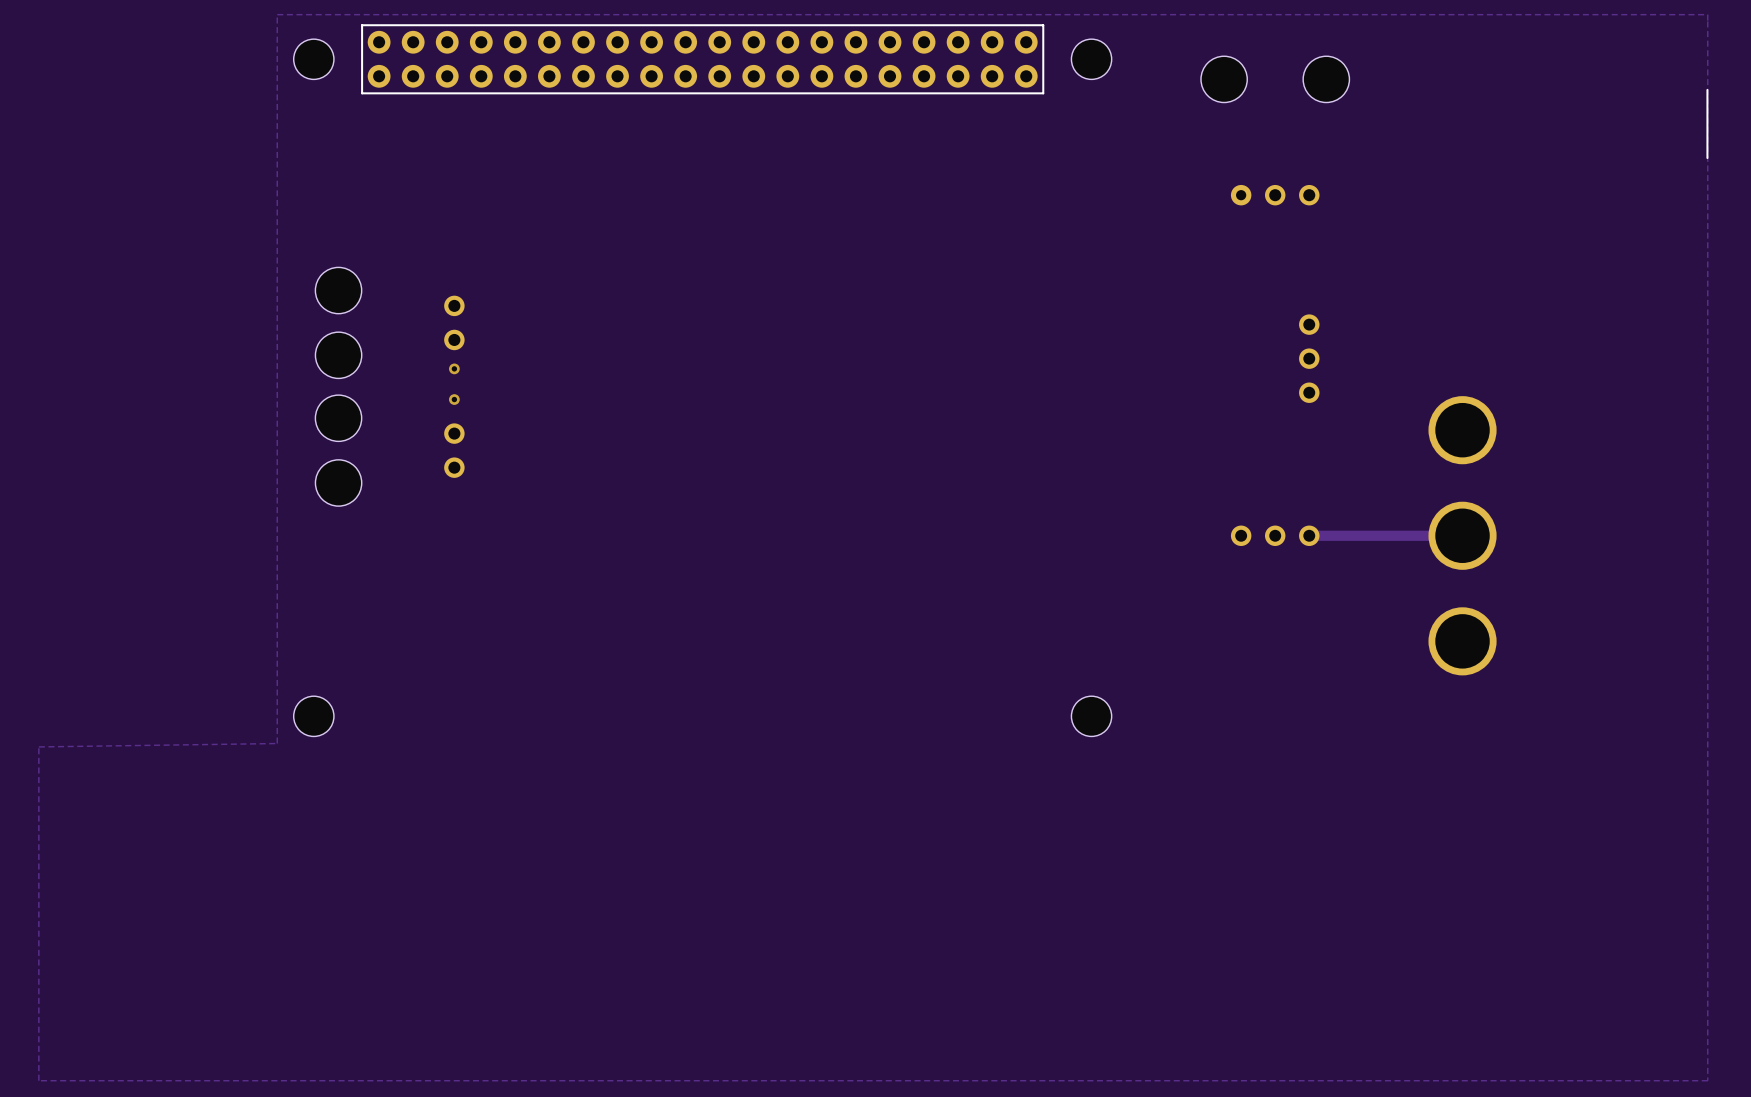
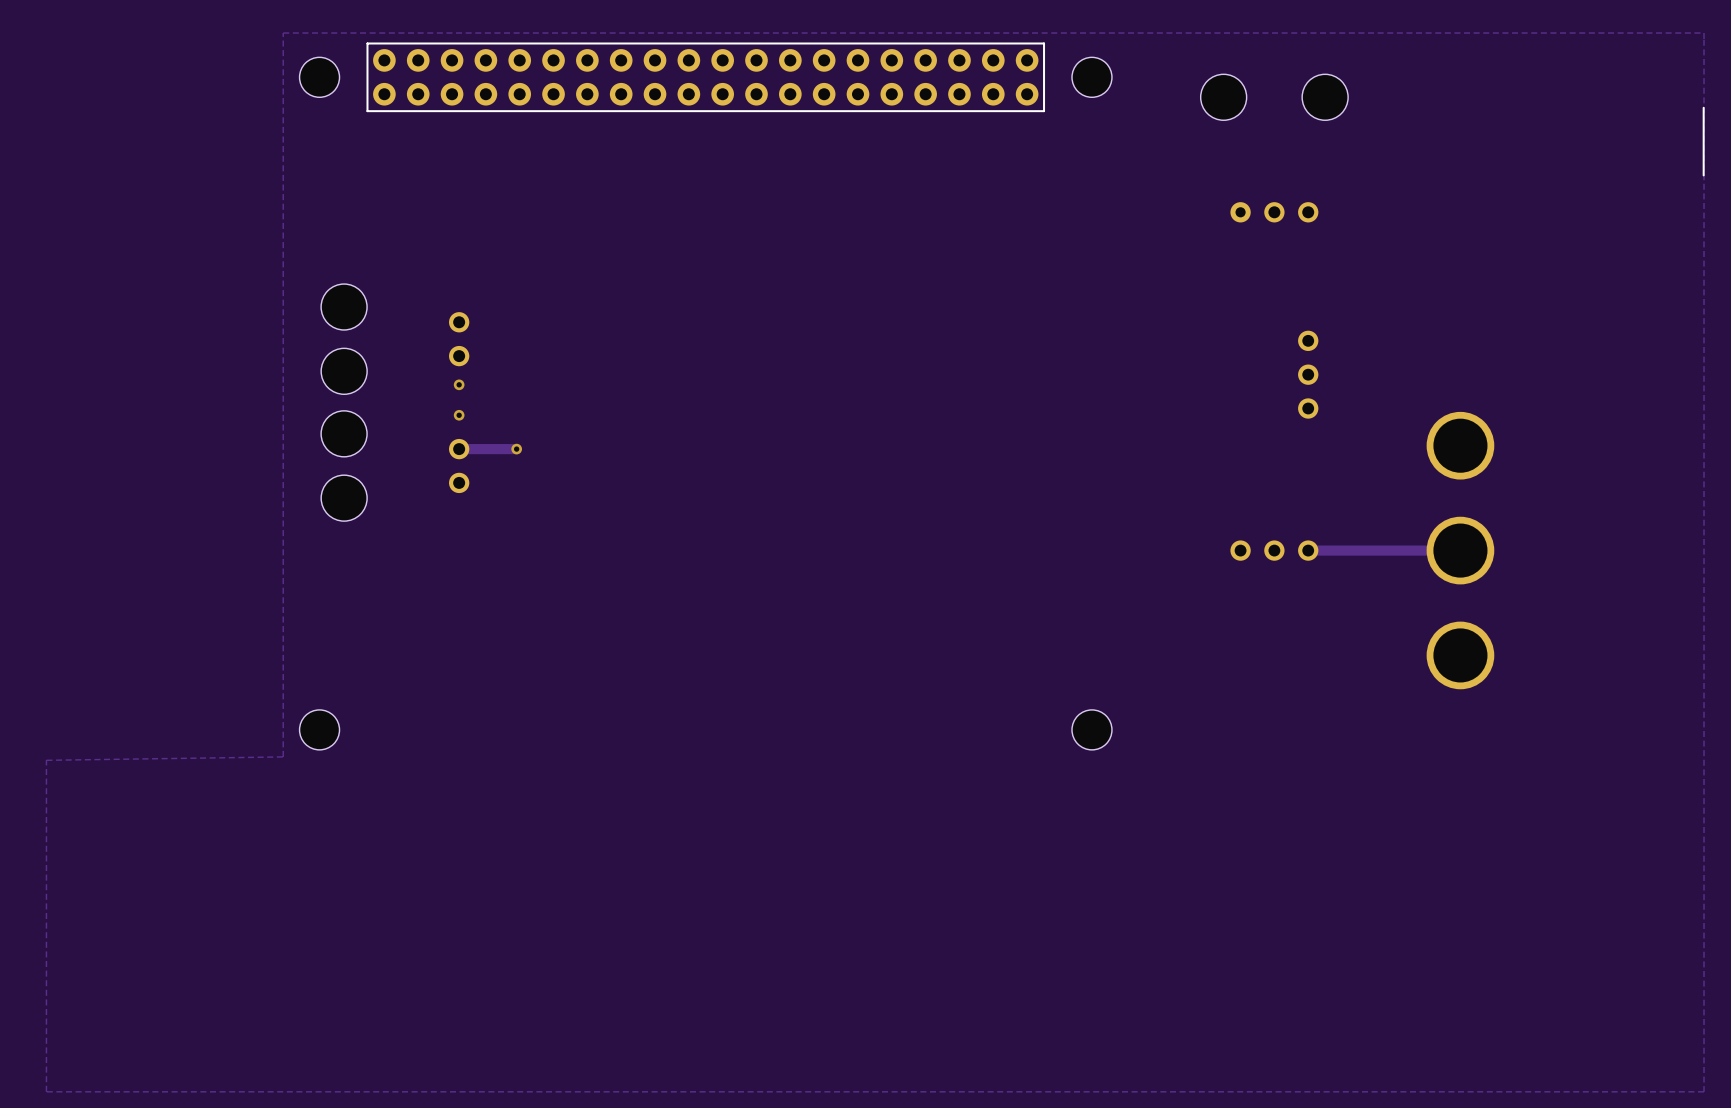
track: none -> (516, 449) (459, 449)
via: none -> (516, 449)

